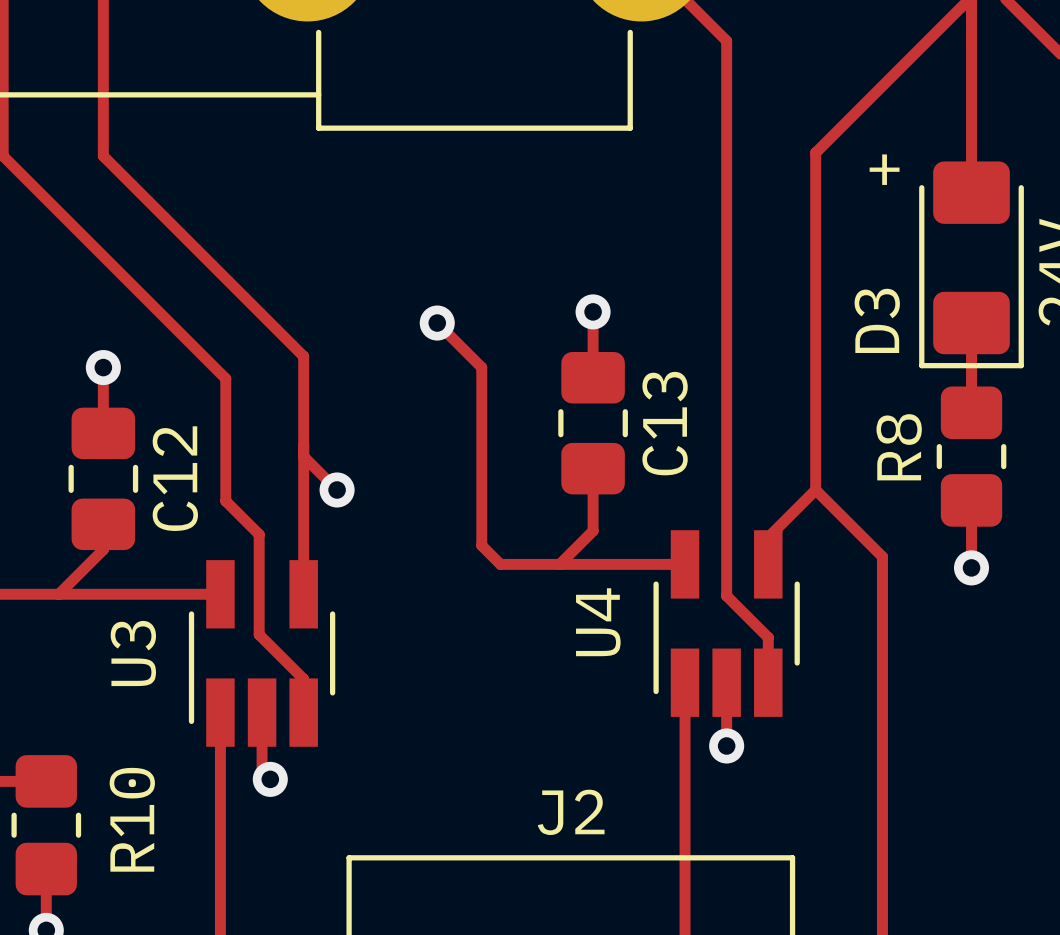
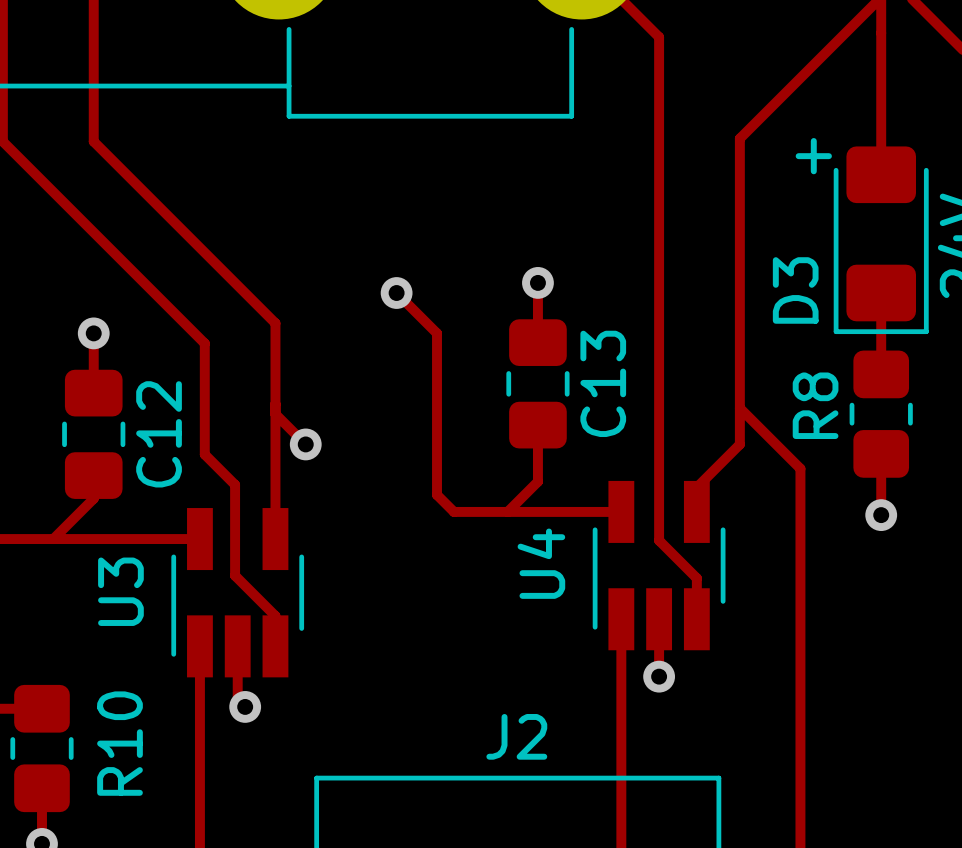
track: (815, 489) (882, 556) -> (739, 408) (800, 468) (800, 505)

